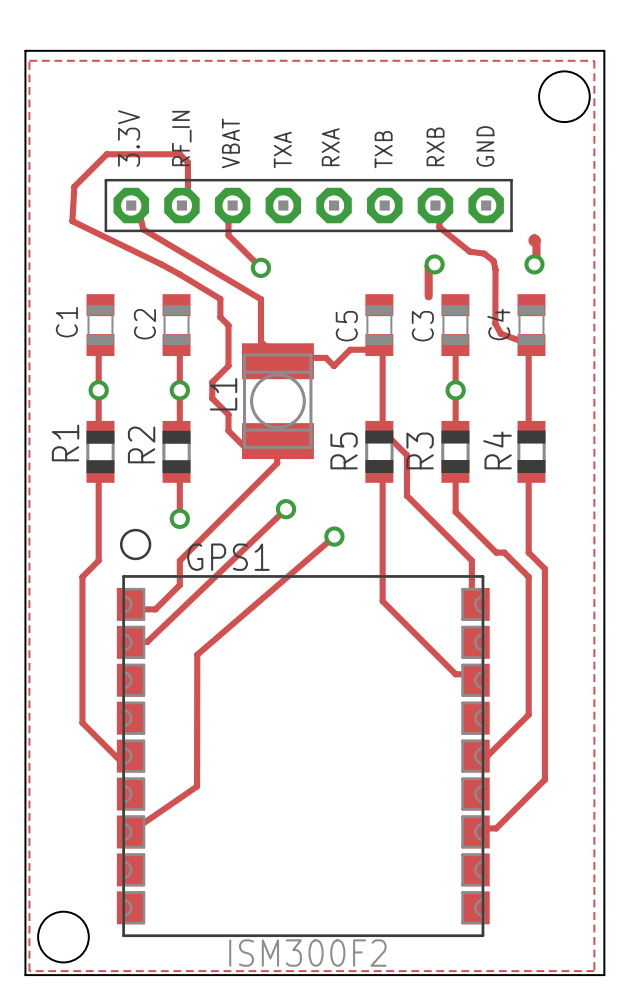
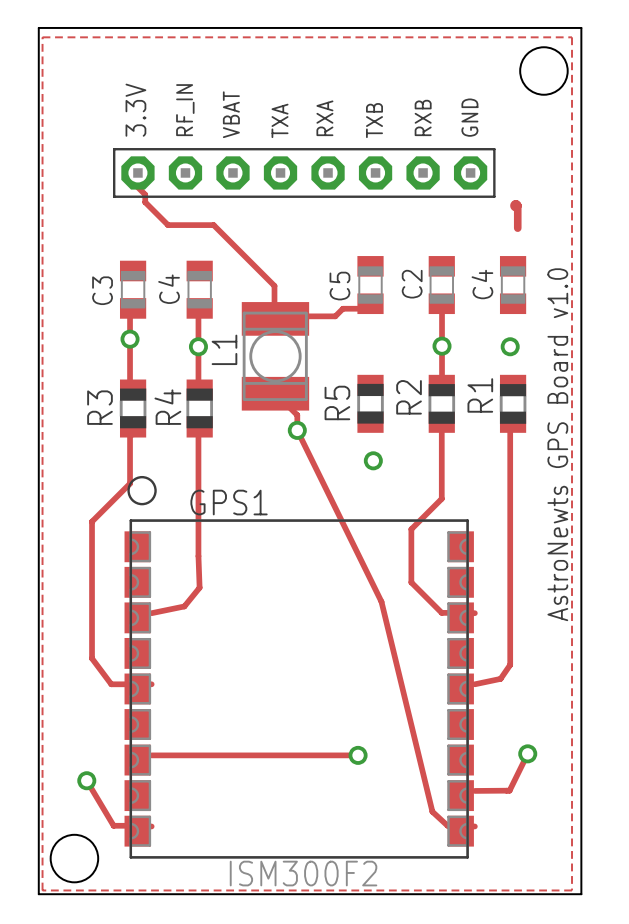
track: (131, 205) (139, 211) (143, 229) (260, 299) (260, 341) (277, 357) (277, 361) (285, 357) (325, 357) (333, 365) (350, 349) (374, 349) (379, 345) (382, 349) (382, 430) (406, 455) (406, 495) (471, 560) (471, 601) (475, 604) -> (137, 172) (130, 179) (145, 194) (145, 202) (168, 225) (213, 225) (274, 285) (274, 316) (280, 318) (282, 316) (335, 316) (342, 308) (370, 308)
track: (181, 205) (187, 202) (187, 162) (179, 154) (106, 154) (74, 186) (72, 221) (161, 264) (220, 298) (220, 317) (228, 325) (228, 365) (212, 382) (212, 398) (228, 414) (228, 430) (244, 447) (277, 447) -> none
track: (232, 205) (228, 211) (228, 235) (260, 267) -> none
track: (435, 205) (439, 211) (439, 227) (469, 251) (484, 253) (493, 260) (495, 269) (495, 323) (500, 333) (531, 345) (528, 349) (528, 430) (531, 431) -> none
track: (432, 262) (428, 265) (428, 296) -> none
via: (434, 264) -> none
via: (534, 264) -> none
via: (260, 267) -> none
C1: (100, 325) -> none
C2: (176, 325) -> none
C3 name: C3 (422, 326) -> C2 (412, 284)
C3: none -> (133, 289)
C4: none -> (199, 289)
track: (100, 345) (98, 349) (98, 430) (100, 431) -> none
track: (176, 345) (179, 349) (179, 430) (176, 431) -> none
track: none -> (133, 308) (130, 308) (130, 384) (133, 389)
track: none -> (197, 312) (199, 308) (199, 389) (197, 388)
via position: (98, 390) -> (130, 339)
via position: (179, 390) -> (198, 346)
via: none -> (510, 346)
track: none -> (280, 393) (282, 399) (297, 415) (297, 430) (381, 601) (432, 811) (447, 825) (474, 826)
track: (277, 447) (277, 463) (179, 560) (179, 585) (155, 609) (131, 609) (130, 604) -> none
R3 name: R3 (420, 450) -> R2 (409, 397)
R4 name: R4 (497, 450) -> R1 (480, 395)
R1: (100, 451) -> none
R2: (176, 451) -> none
R3: none -> (133, 408)
R4: none -> (199, 408)
track: (100, 471) (98, 479) (98, 560) (82, 576) (82, 722) (123, 763) (130, 756) -> none
track: (176, 471) (179, 479) (179, 518) -> none
track: (379, 471) (382, 479) (382, 601) (455, 674) (471, 674) (475, 680) -> none
track: (455, 471) (455, 512) (496, 552) (504, 552) (528, 576) (528, 714) (480, 763) (475, 756) -> none
track: (531, 471) (528, 479) (528, 552) (544, 568) (544, 779) (496, 828) (480, 828) (475, 831) -> none
track: none -> (199, 427) (199, 587) (184, 606) (151, 613)
track: none -> (442, 427) (441, 498) (411, 529) (411, 582) (441, 612) (474, 613)
track: none -> (511, 427) (510, 664) (500, 678) (474, 684)
via: none -> (297, 430)
track: none -> (133, 434) (133, 427) (130, 430) (130, 483) (92, 521) (92, 658) (111, 684) (151, 684)
text: none -> AstroNewts GPS Board v1.0 (557, 444)
track: (286, 509) (147, 641) (130, 642) -> none
via: (286, 509) -> none
via: none -> (373, 460)
via: (179, 518) -> none
track: (334, 536) (197, 654) (197, 786) (130, 831) -> none
via: (334, 536) -> none
track: none -> (527, 753) (509, 790) (474, 790)
via: none -> (527, 753)
track: none -> (151, 755) (358, 755)
via: none -> (358, 755)
track: none -> (86, 780) (113, 825) (151, 826)
via: none -> (86, 780)

